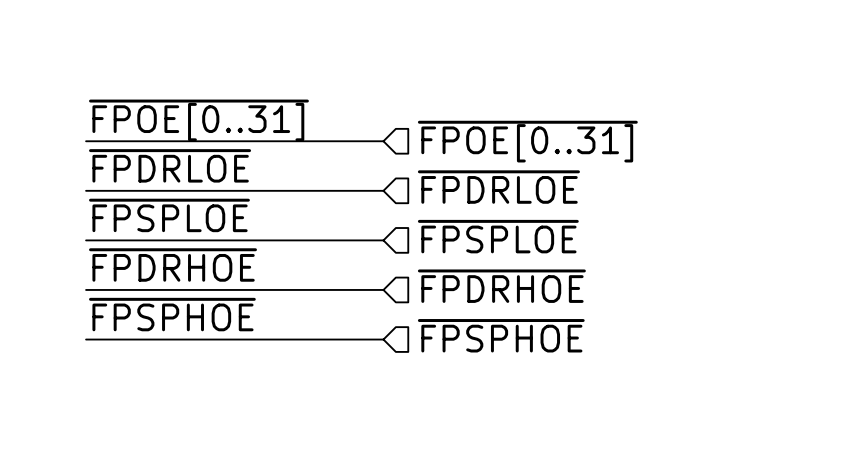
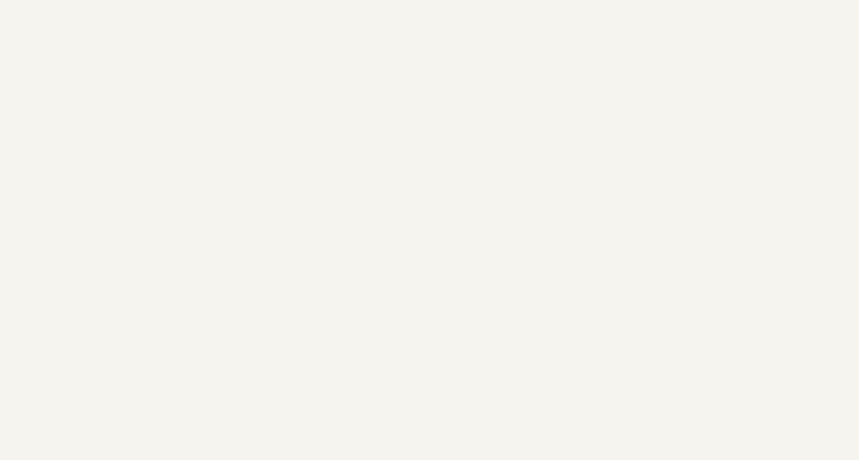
label: ~{FPOE[0..31]} (198, 120) -> none
bus: (86, 141) (383, 141) -> none
hierarchical label: ~{FPOE[0..31]} (527, 141) -> none
label: ~{FPDRLOE} (170, 165) -> none
hierarchical label: ~{FPDRLOE} (498, 187) -> none
wire: (86, 190) (383, 190) -> none
label: ~{FPSPLOE} (169, 215) -> none
hierarchical label: ~{FPSPLOE} (498, 236) -> none
wire: (86, 240) (383, 240) -> none
label: ~{FPDRHOE} (172, 265) -> none
hierarchical label: ~{FPDRHOE} (501, 286) -> none
wire: (86, 289) (383, 289) -> none
label: ~{FPSPHOE} (172, 314) -> none
hierarchical label: ~{FPSPHOE} (501, 335) -> none
wire: (86, 339) (383, 339) -> none

